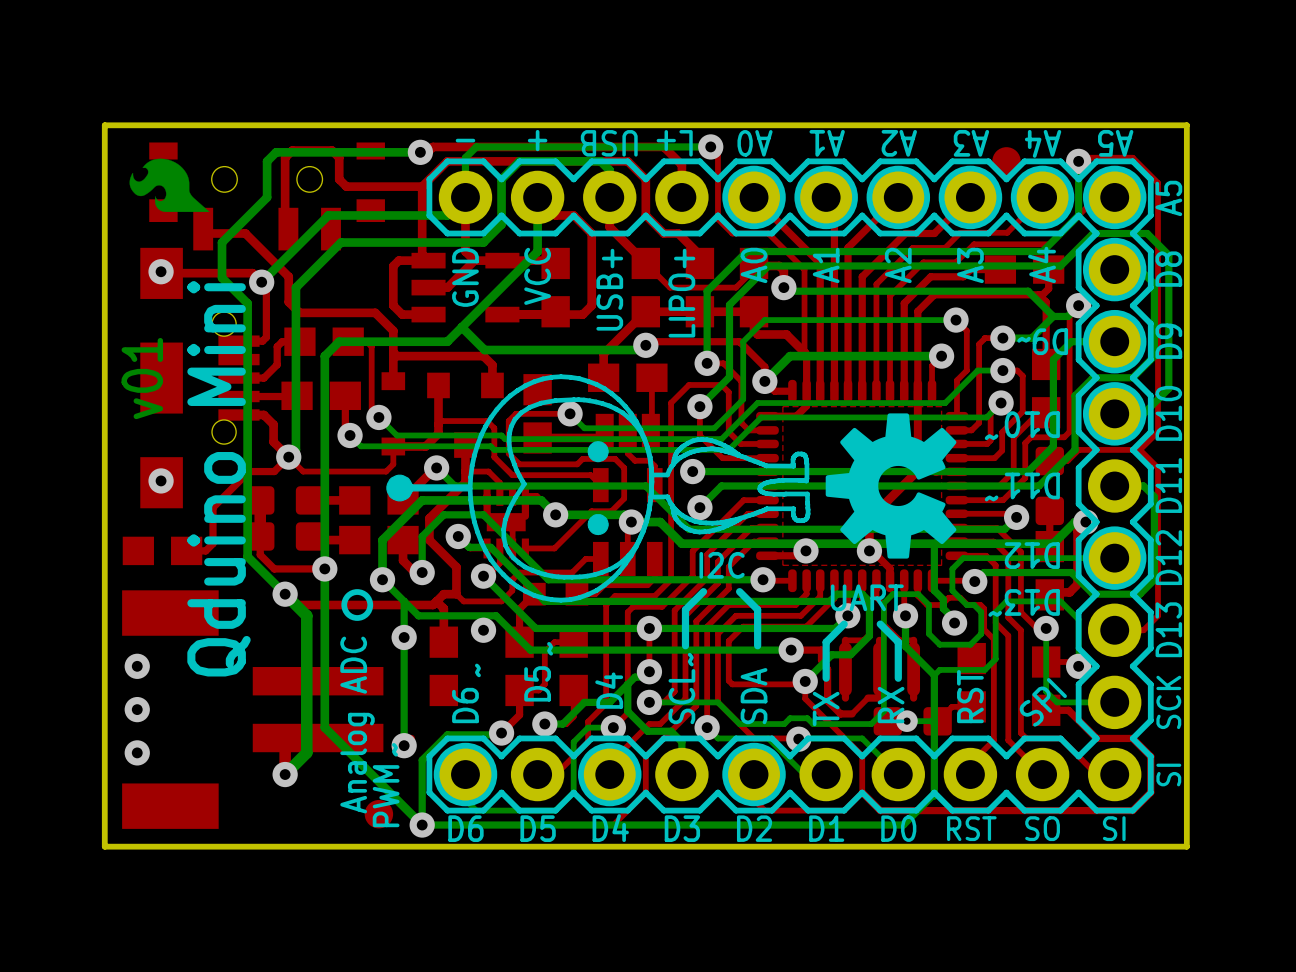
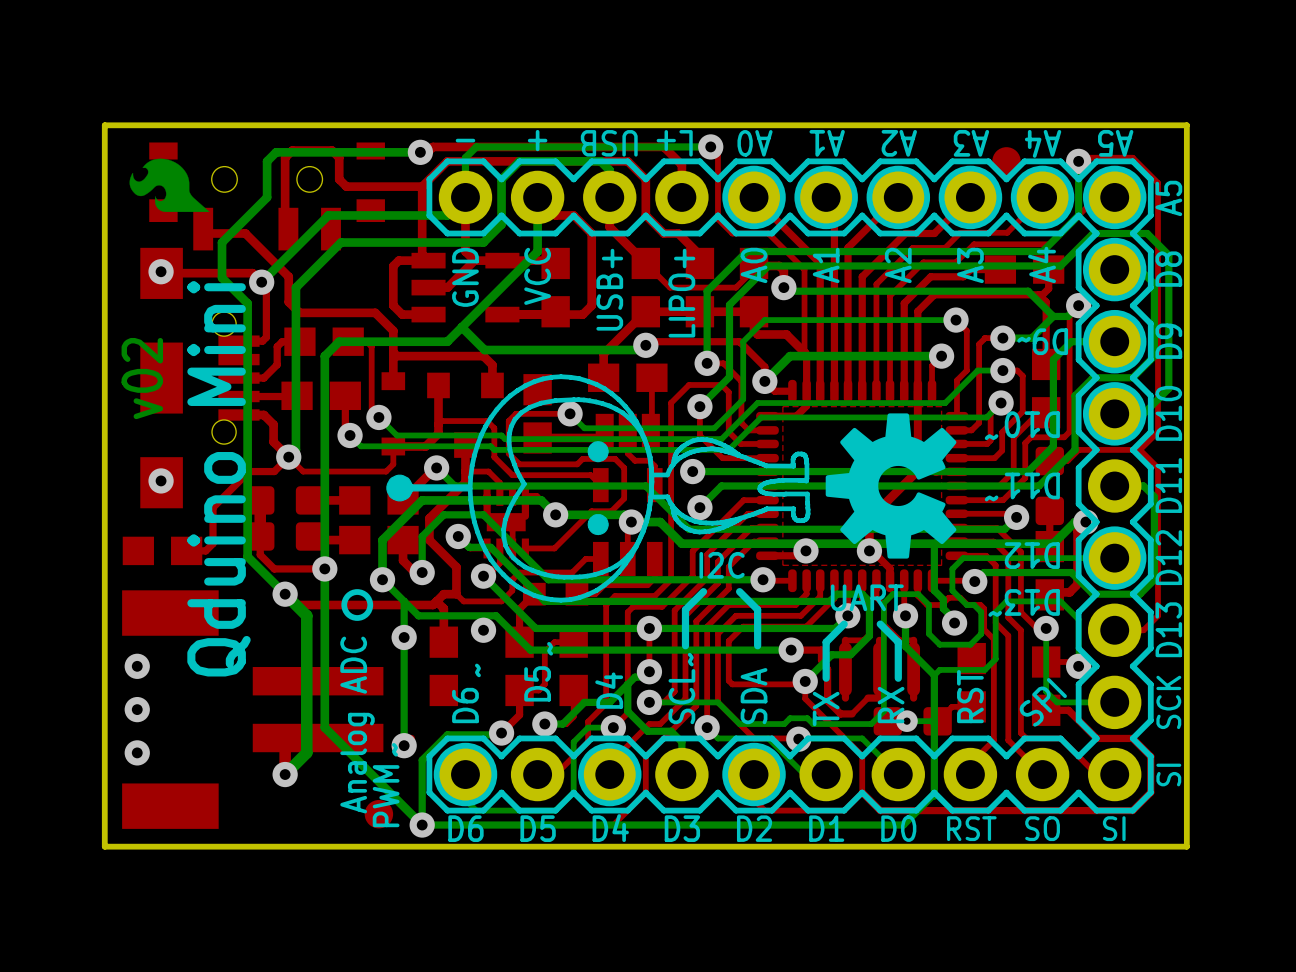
text: v01 (142, 378) -> v02 (142, 378)

